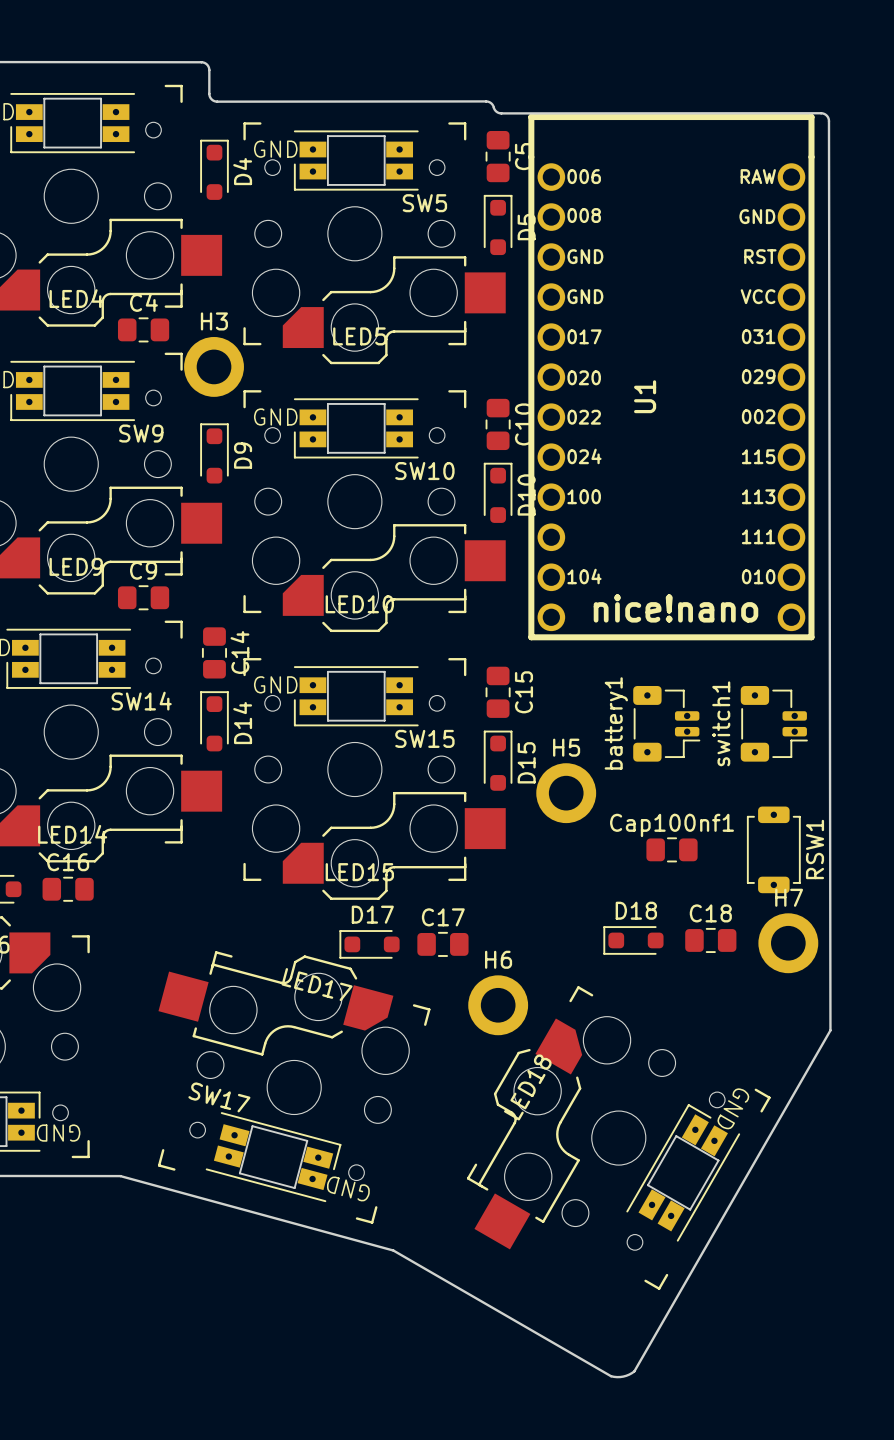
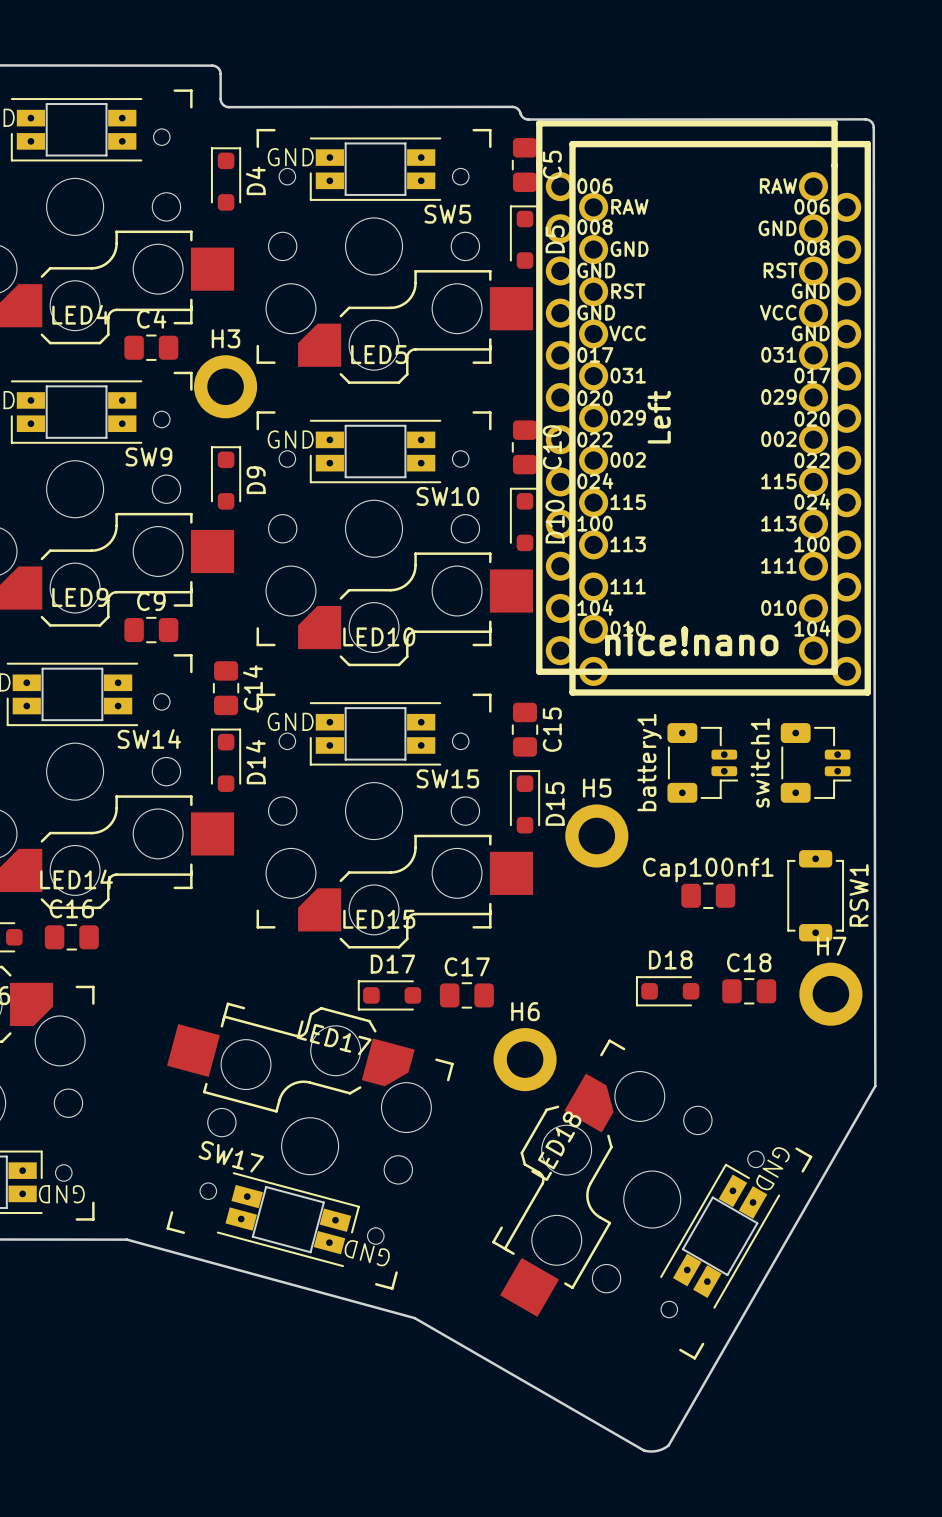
Left: none -> (686, 397)
U1 side: top (671, 377) -> bottom (720, 418)

